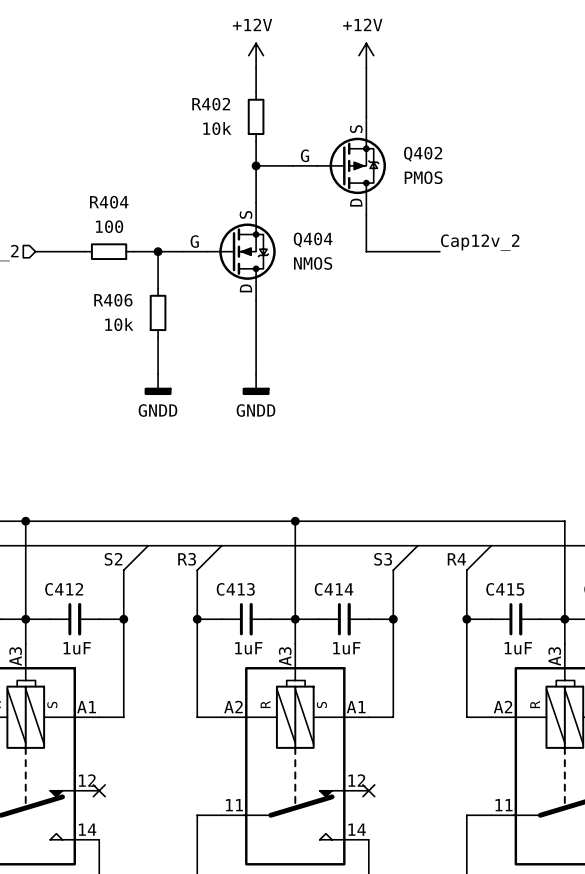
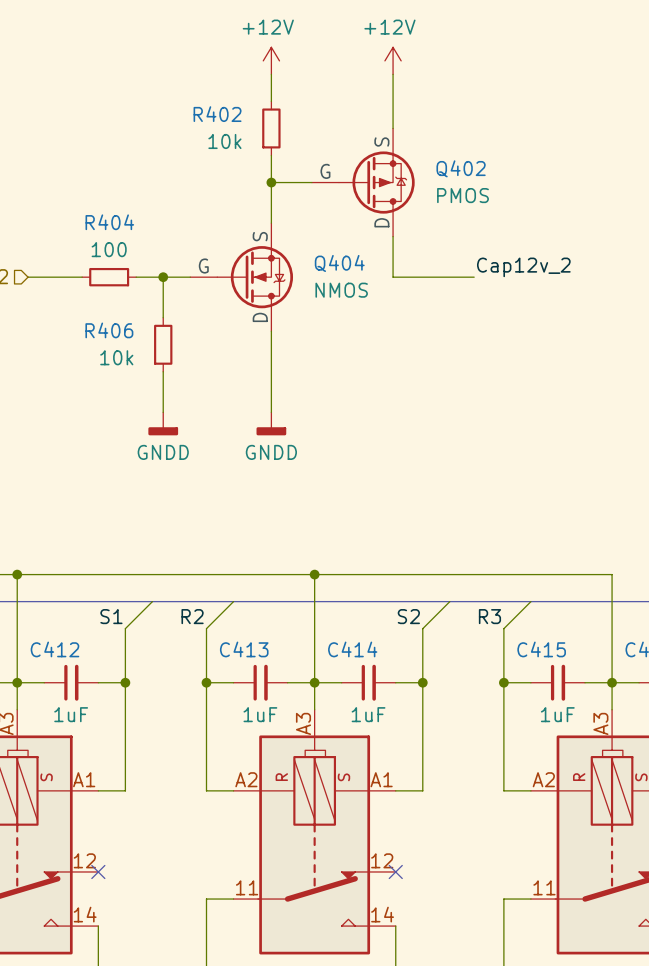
label: S2 (113, 559) -> S1 (111, 616)
label: R3 (187, 559) -> R2 (192, 616)
label: S3 (383, 559) -> S2 (408, 616)
label: R4 (456, 559) -> R3 (489, 616)

